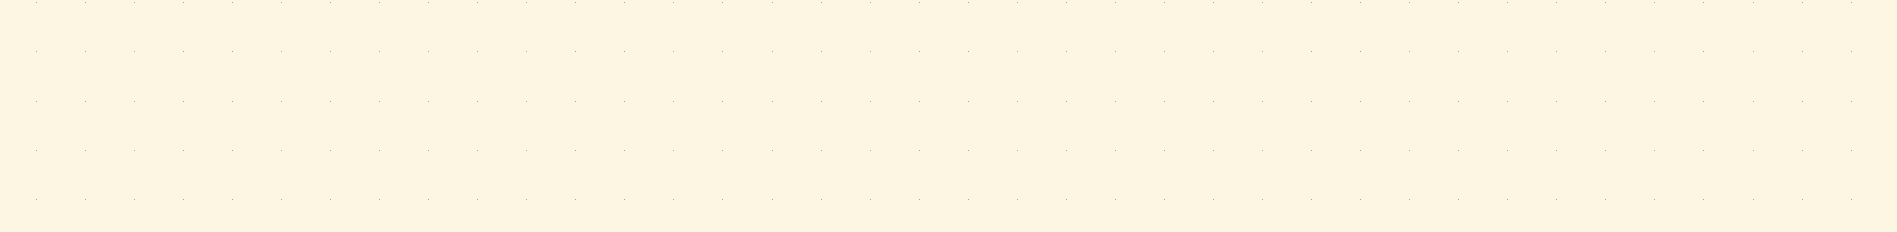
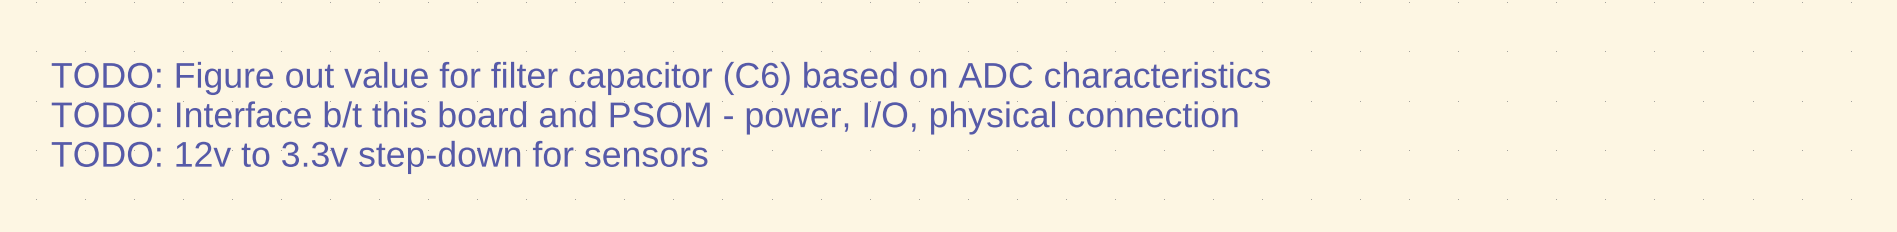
text: none -> TODO: Figure out value for filter capacitor (C6) based on ADC characteristics (660, 78)
text: none -> TODO: Interface b/t this board and PSOM - power, I/O, physical connection (644, 117)
text: none -> TODO: 12v to 3.3v step-down for sensors (379, 157)

